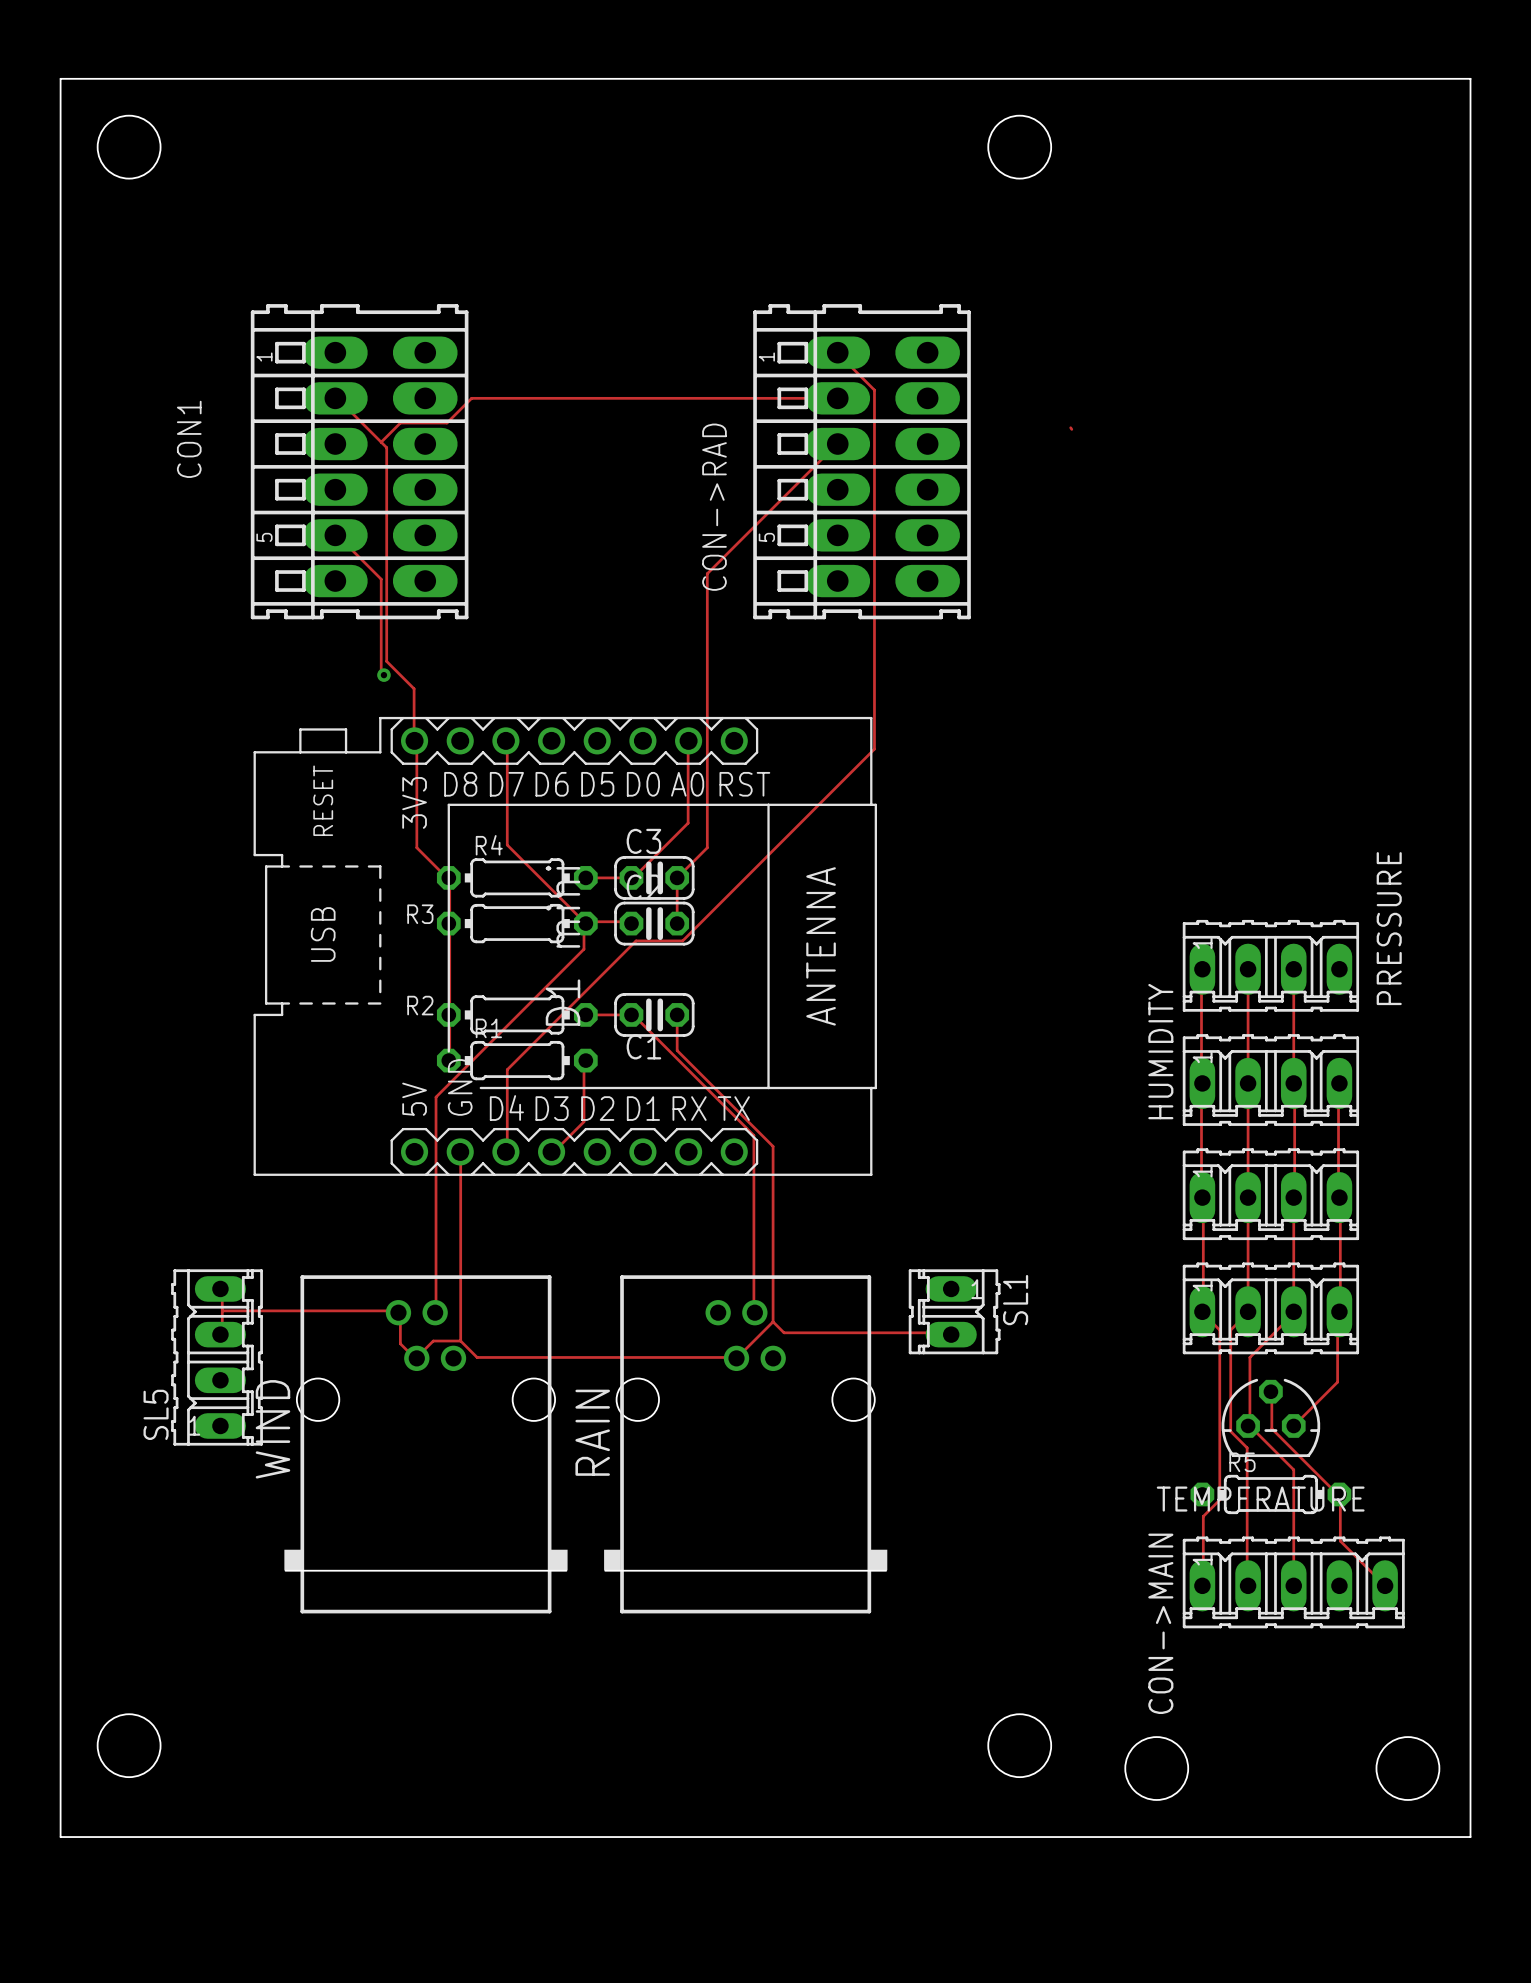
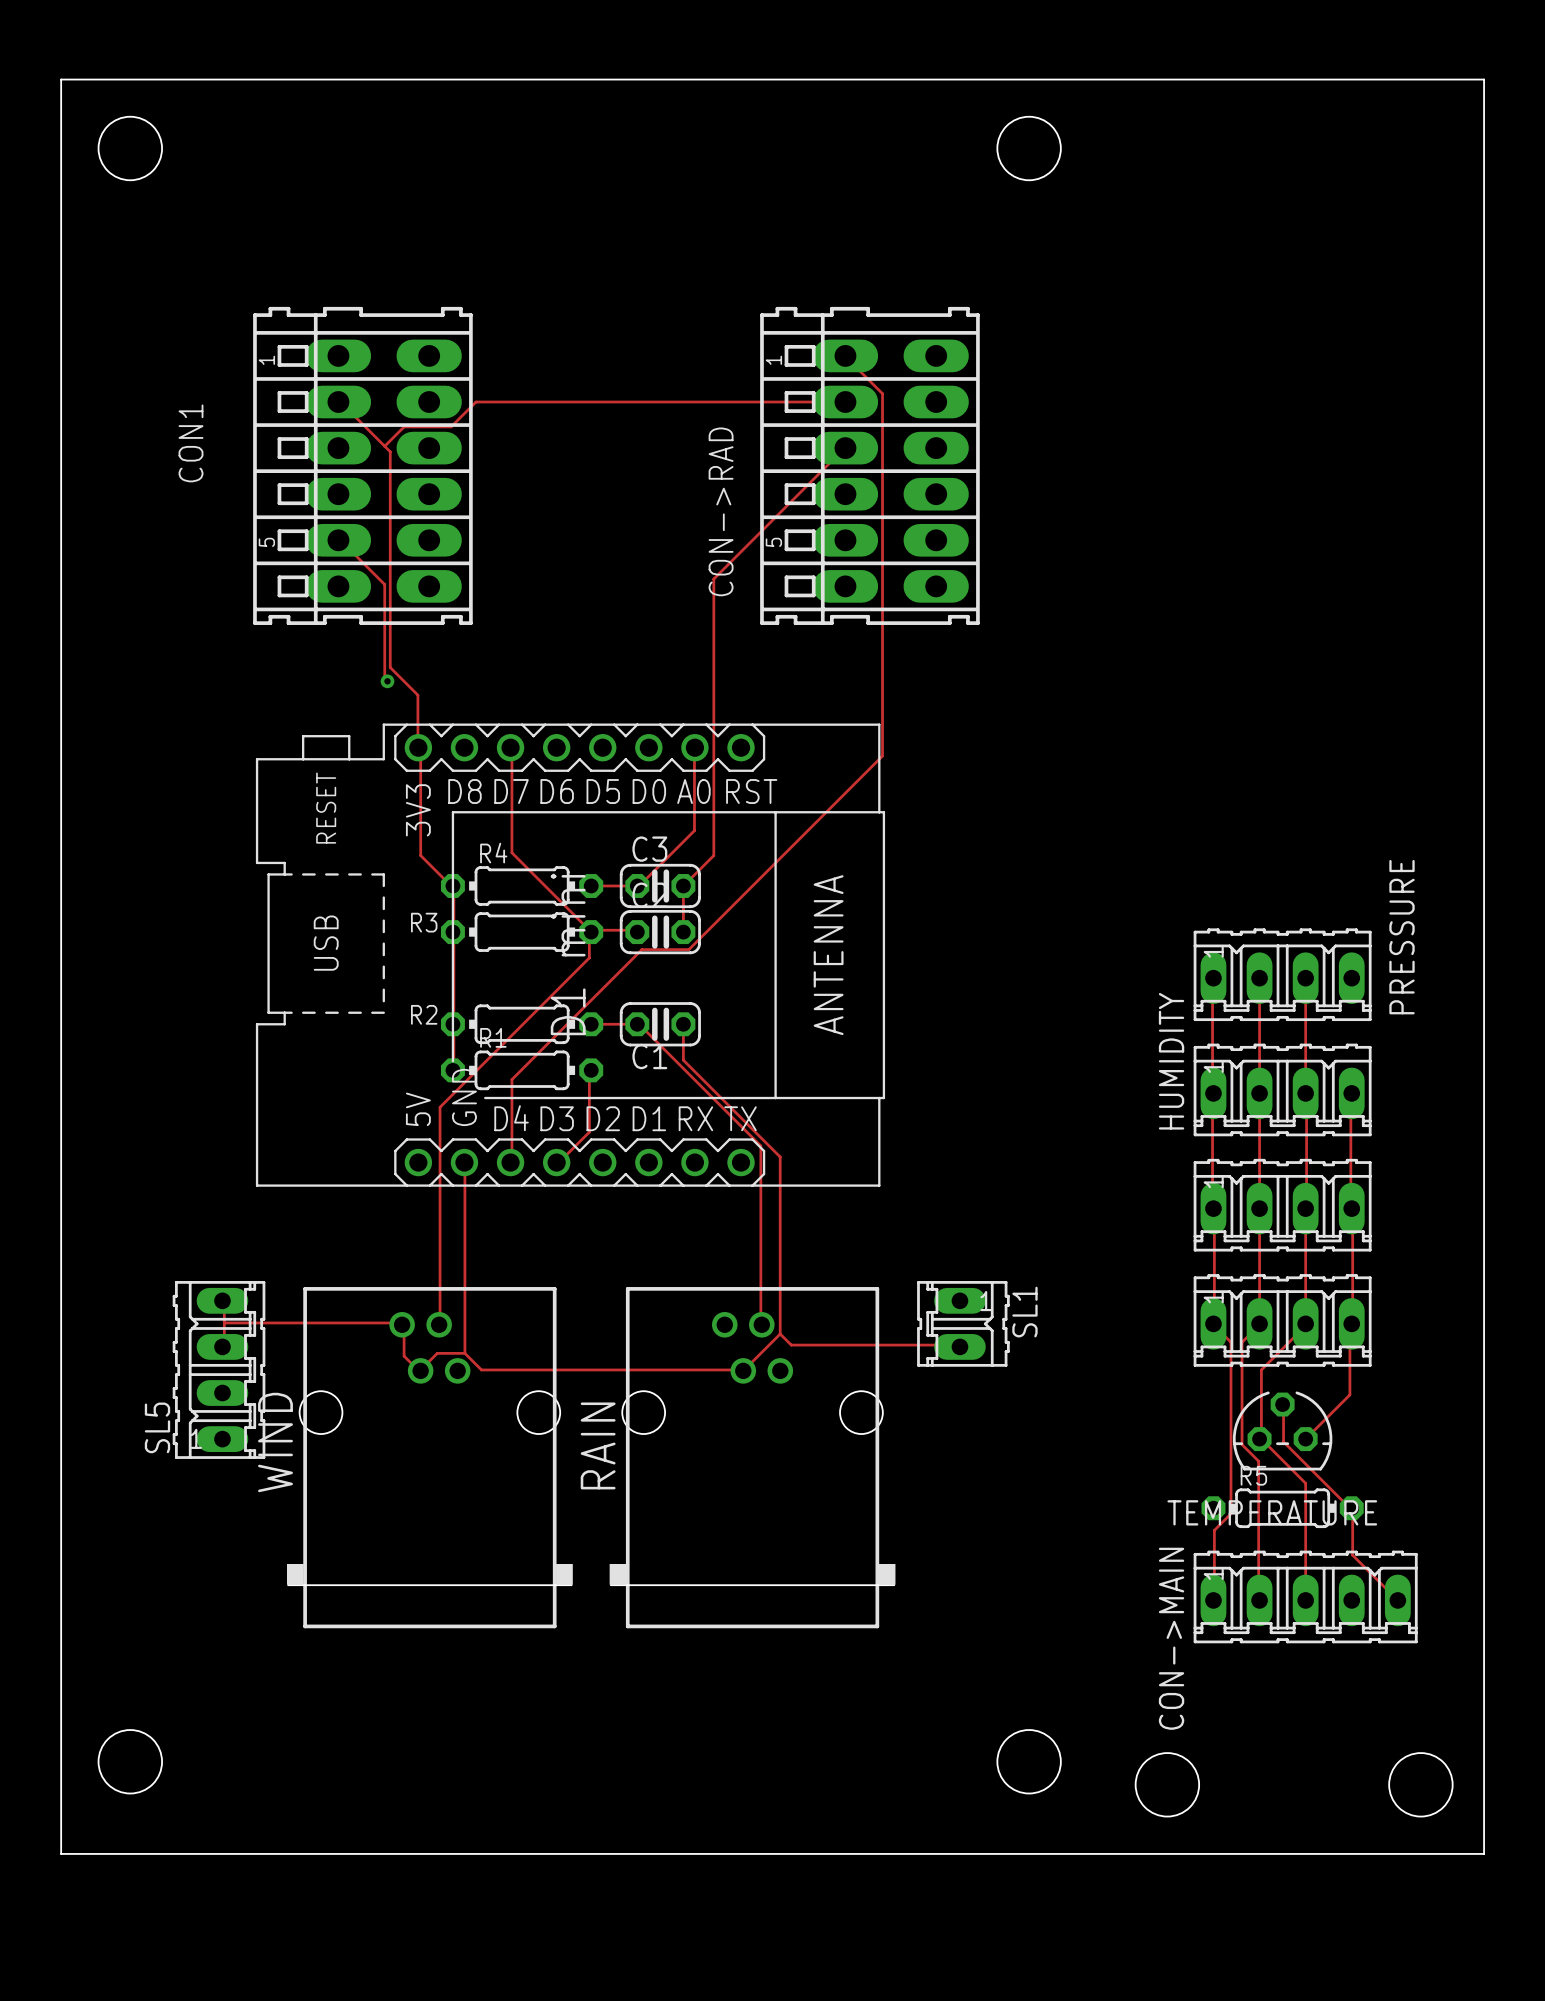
track: (1070, 427) (1071, 429) -> none

